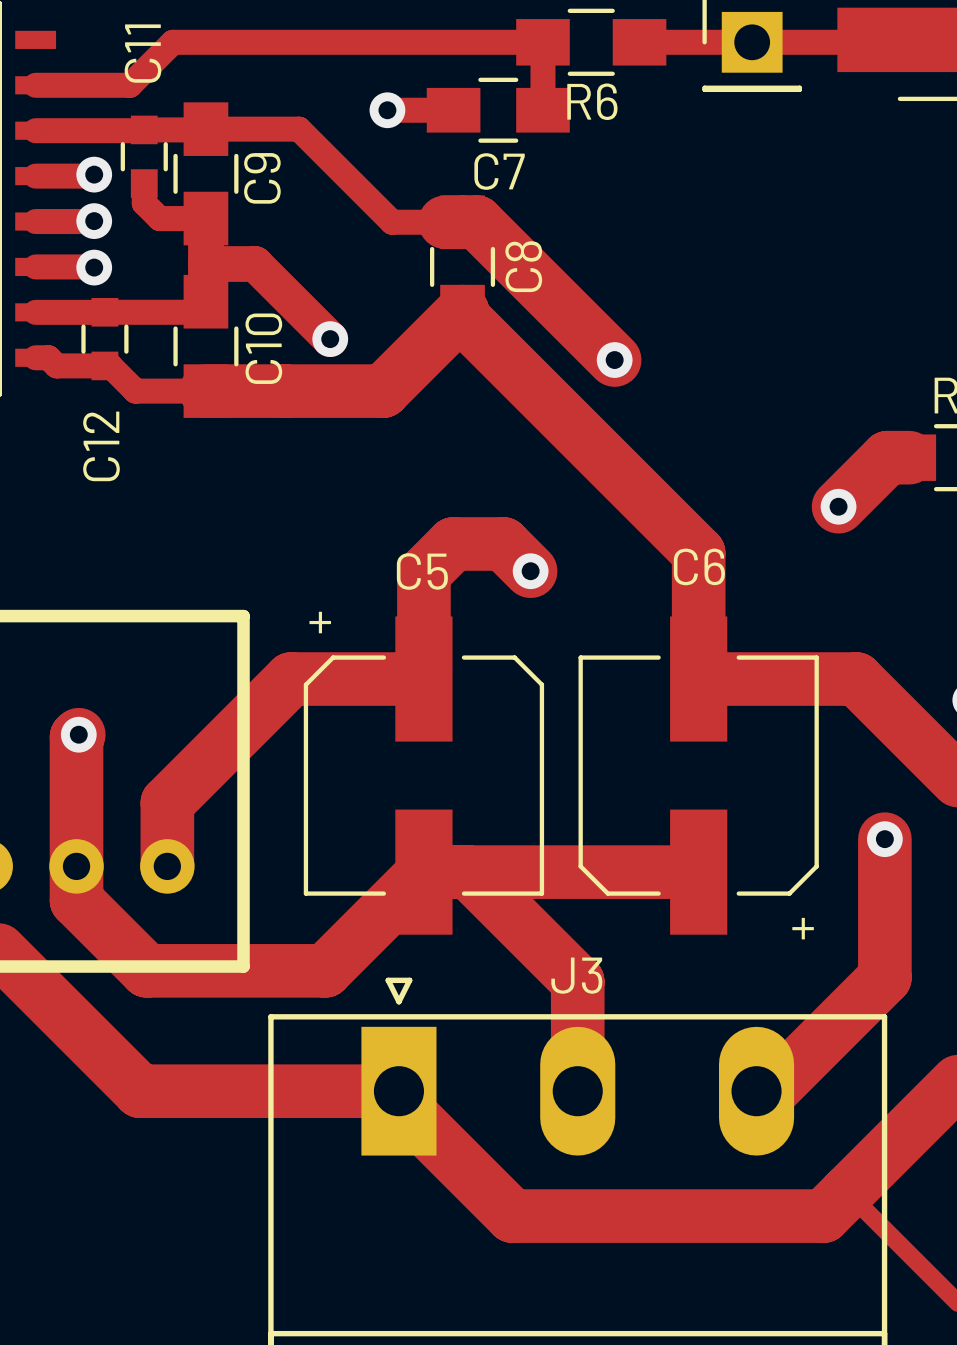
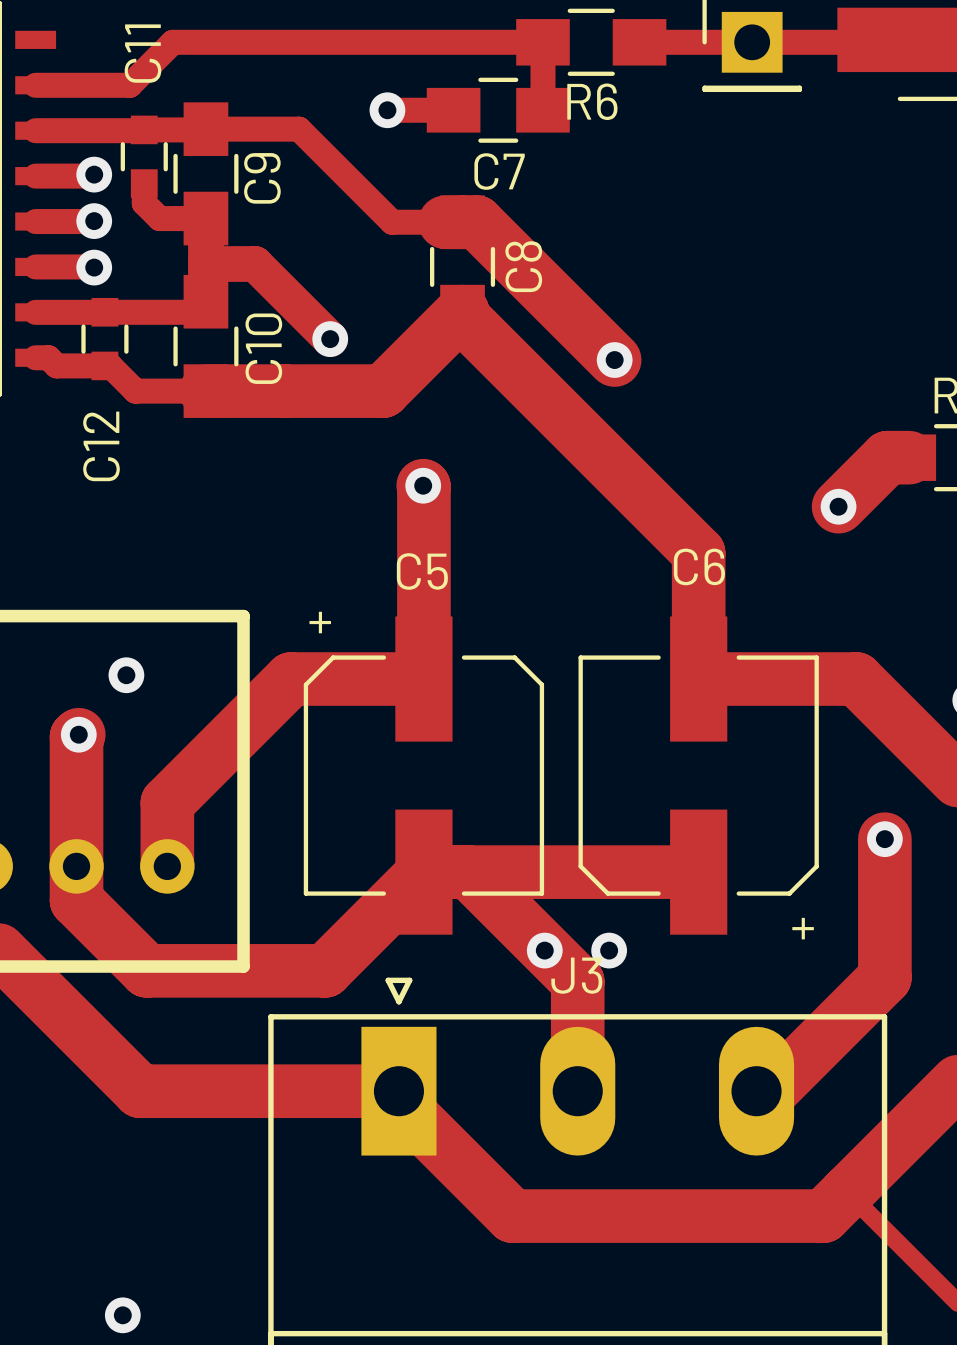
track: (530, 571) (503, 543) (453, 543) (423, 573) -> (423, 485) (423, 573)
via position: (530, 571) -> (423, 485)
via: none -> (126, 675)
via: none -> (544, 950)
via: none -> (609, 950)
via: none -> (122, 1315)

